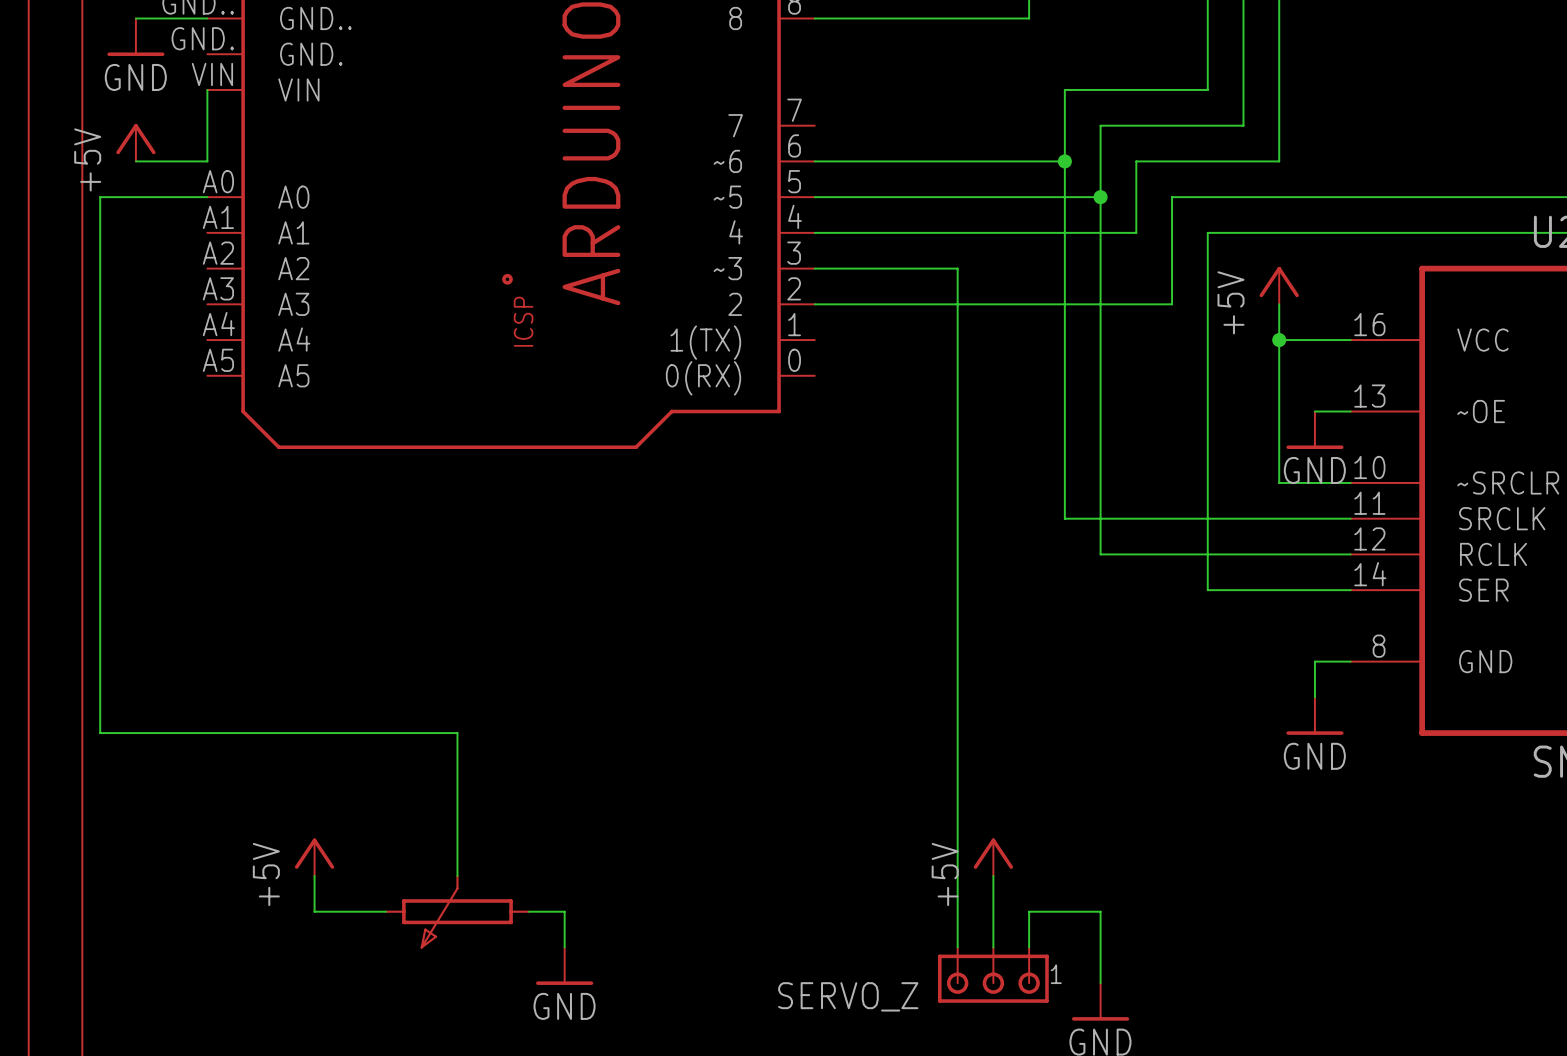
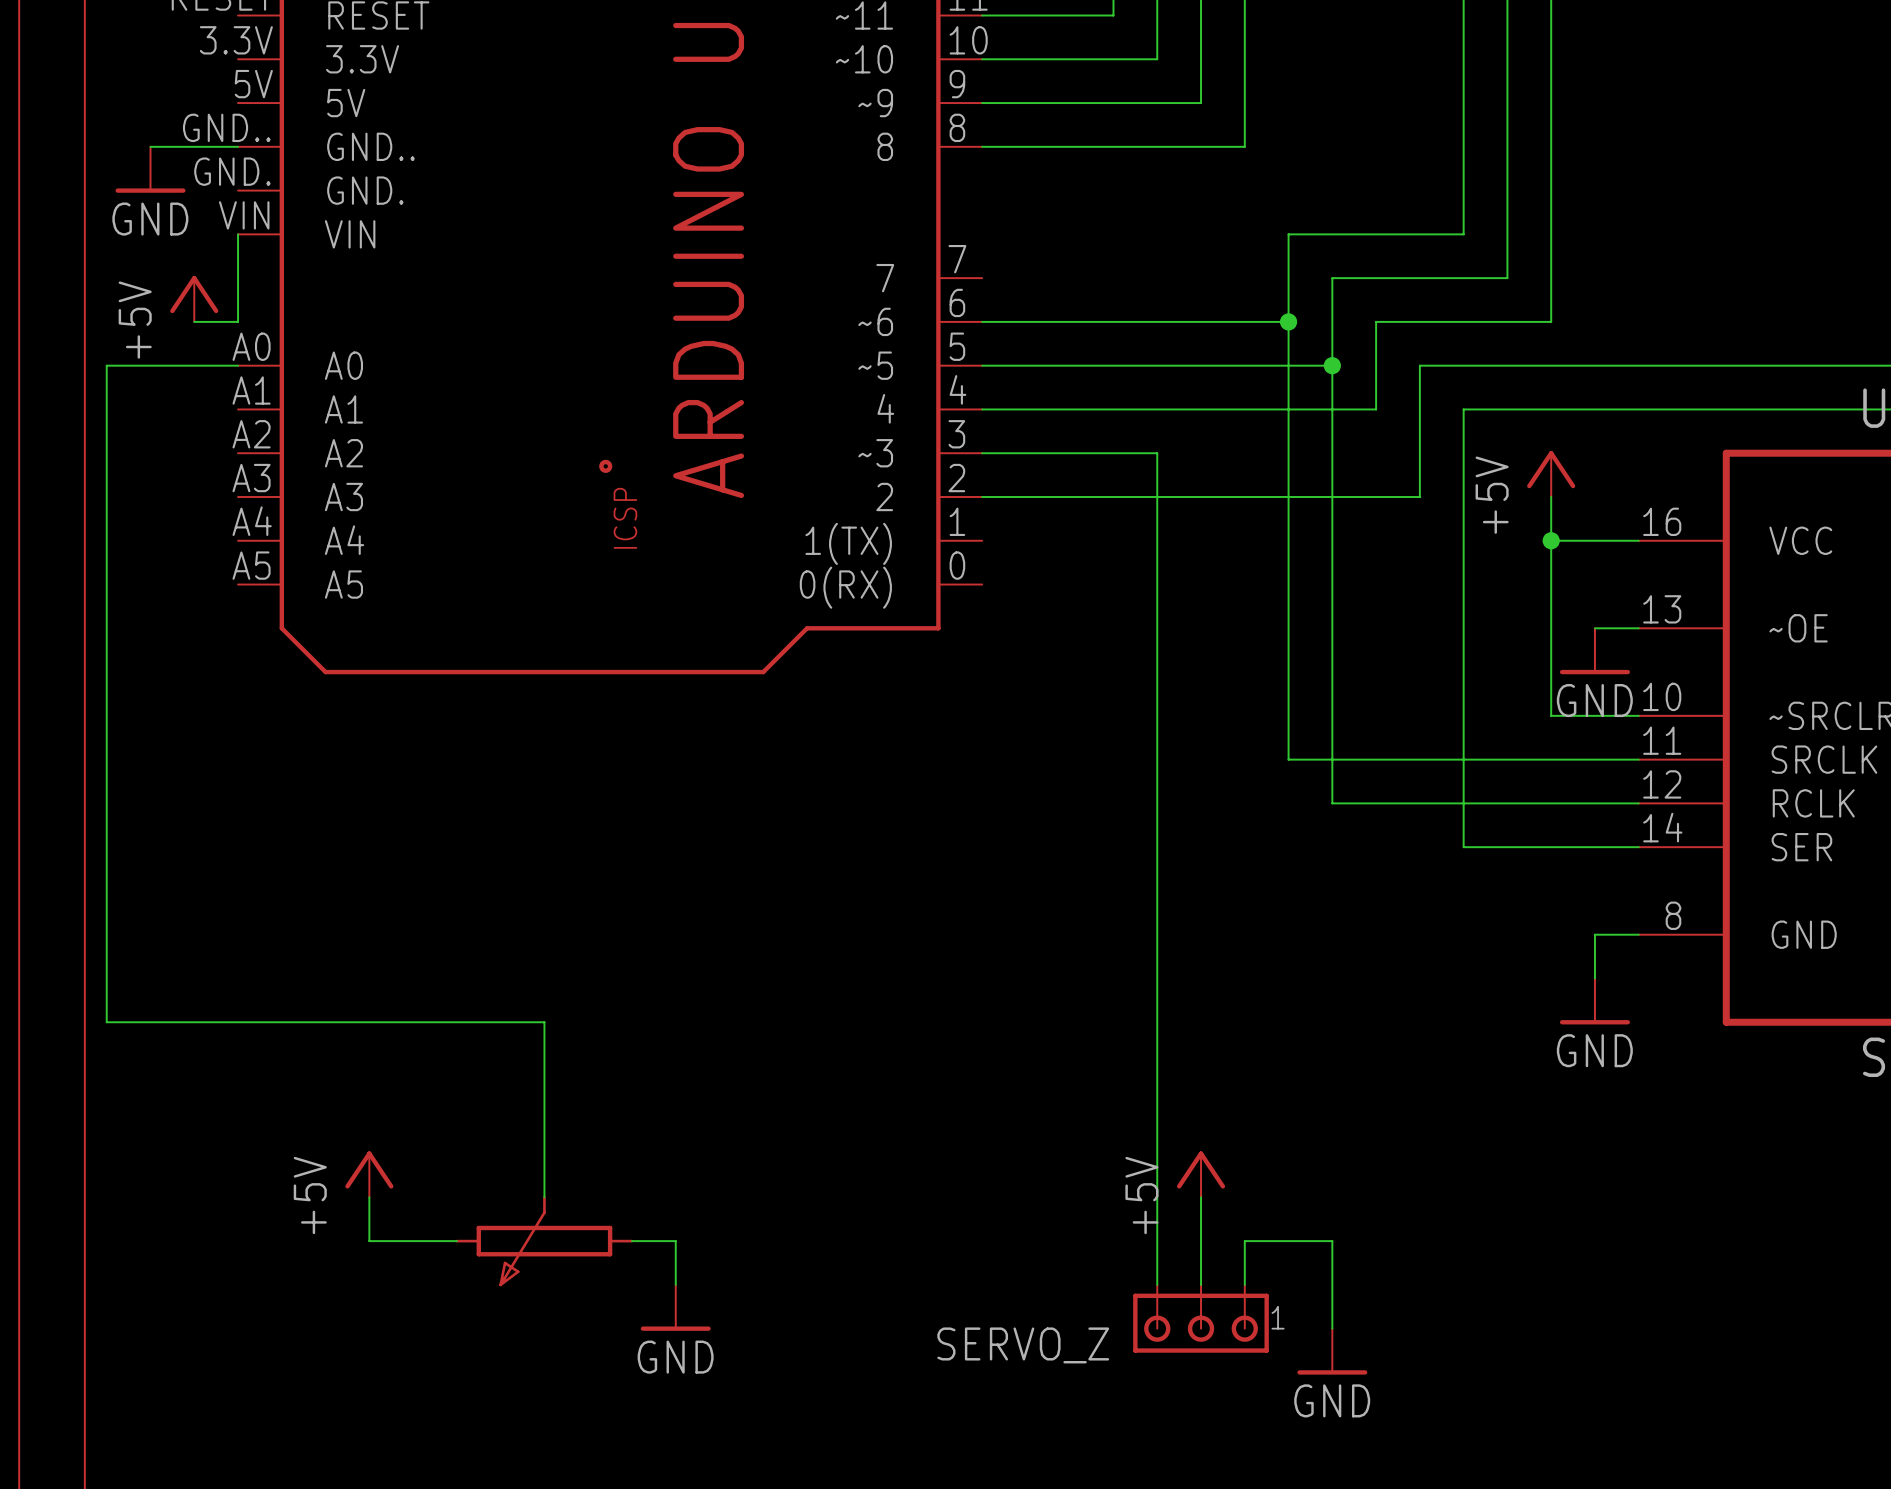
power symbol position: +5V (135, 142) -> +5V (194, 298)
wire: (135, 161) (171, 161) -> none

